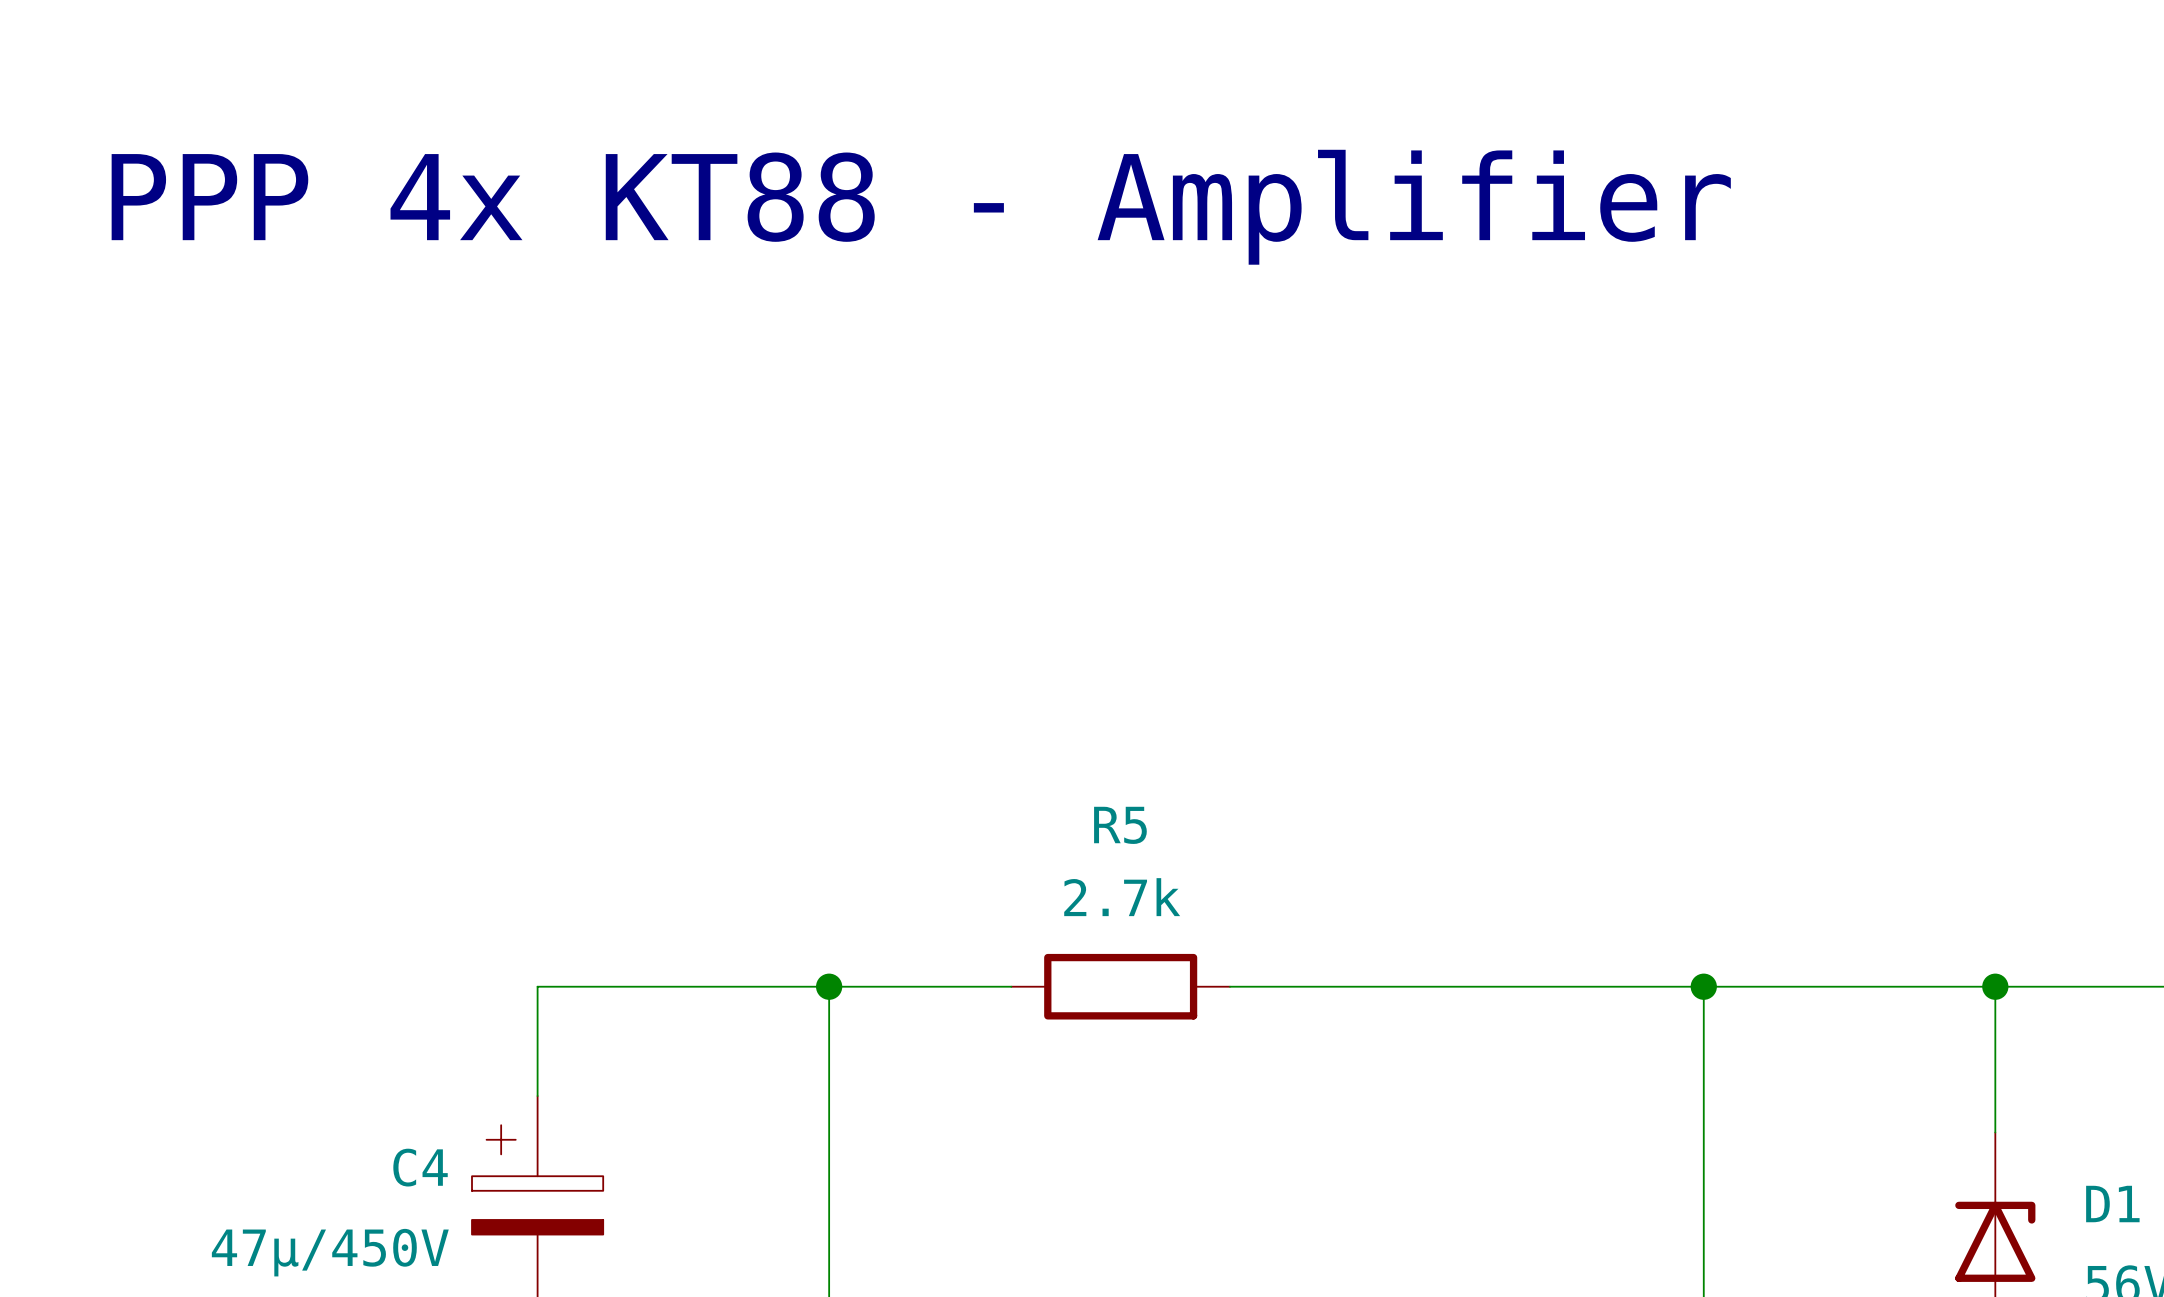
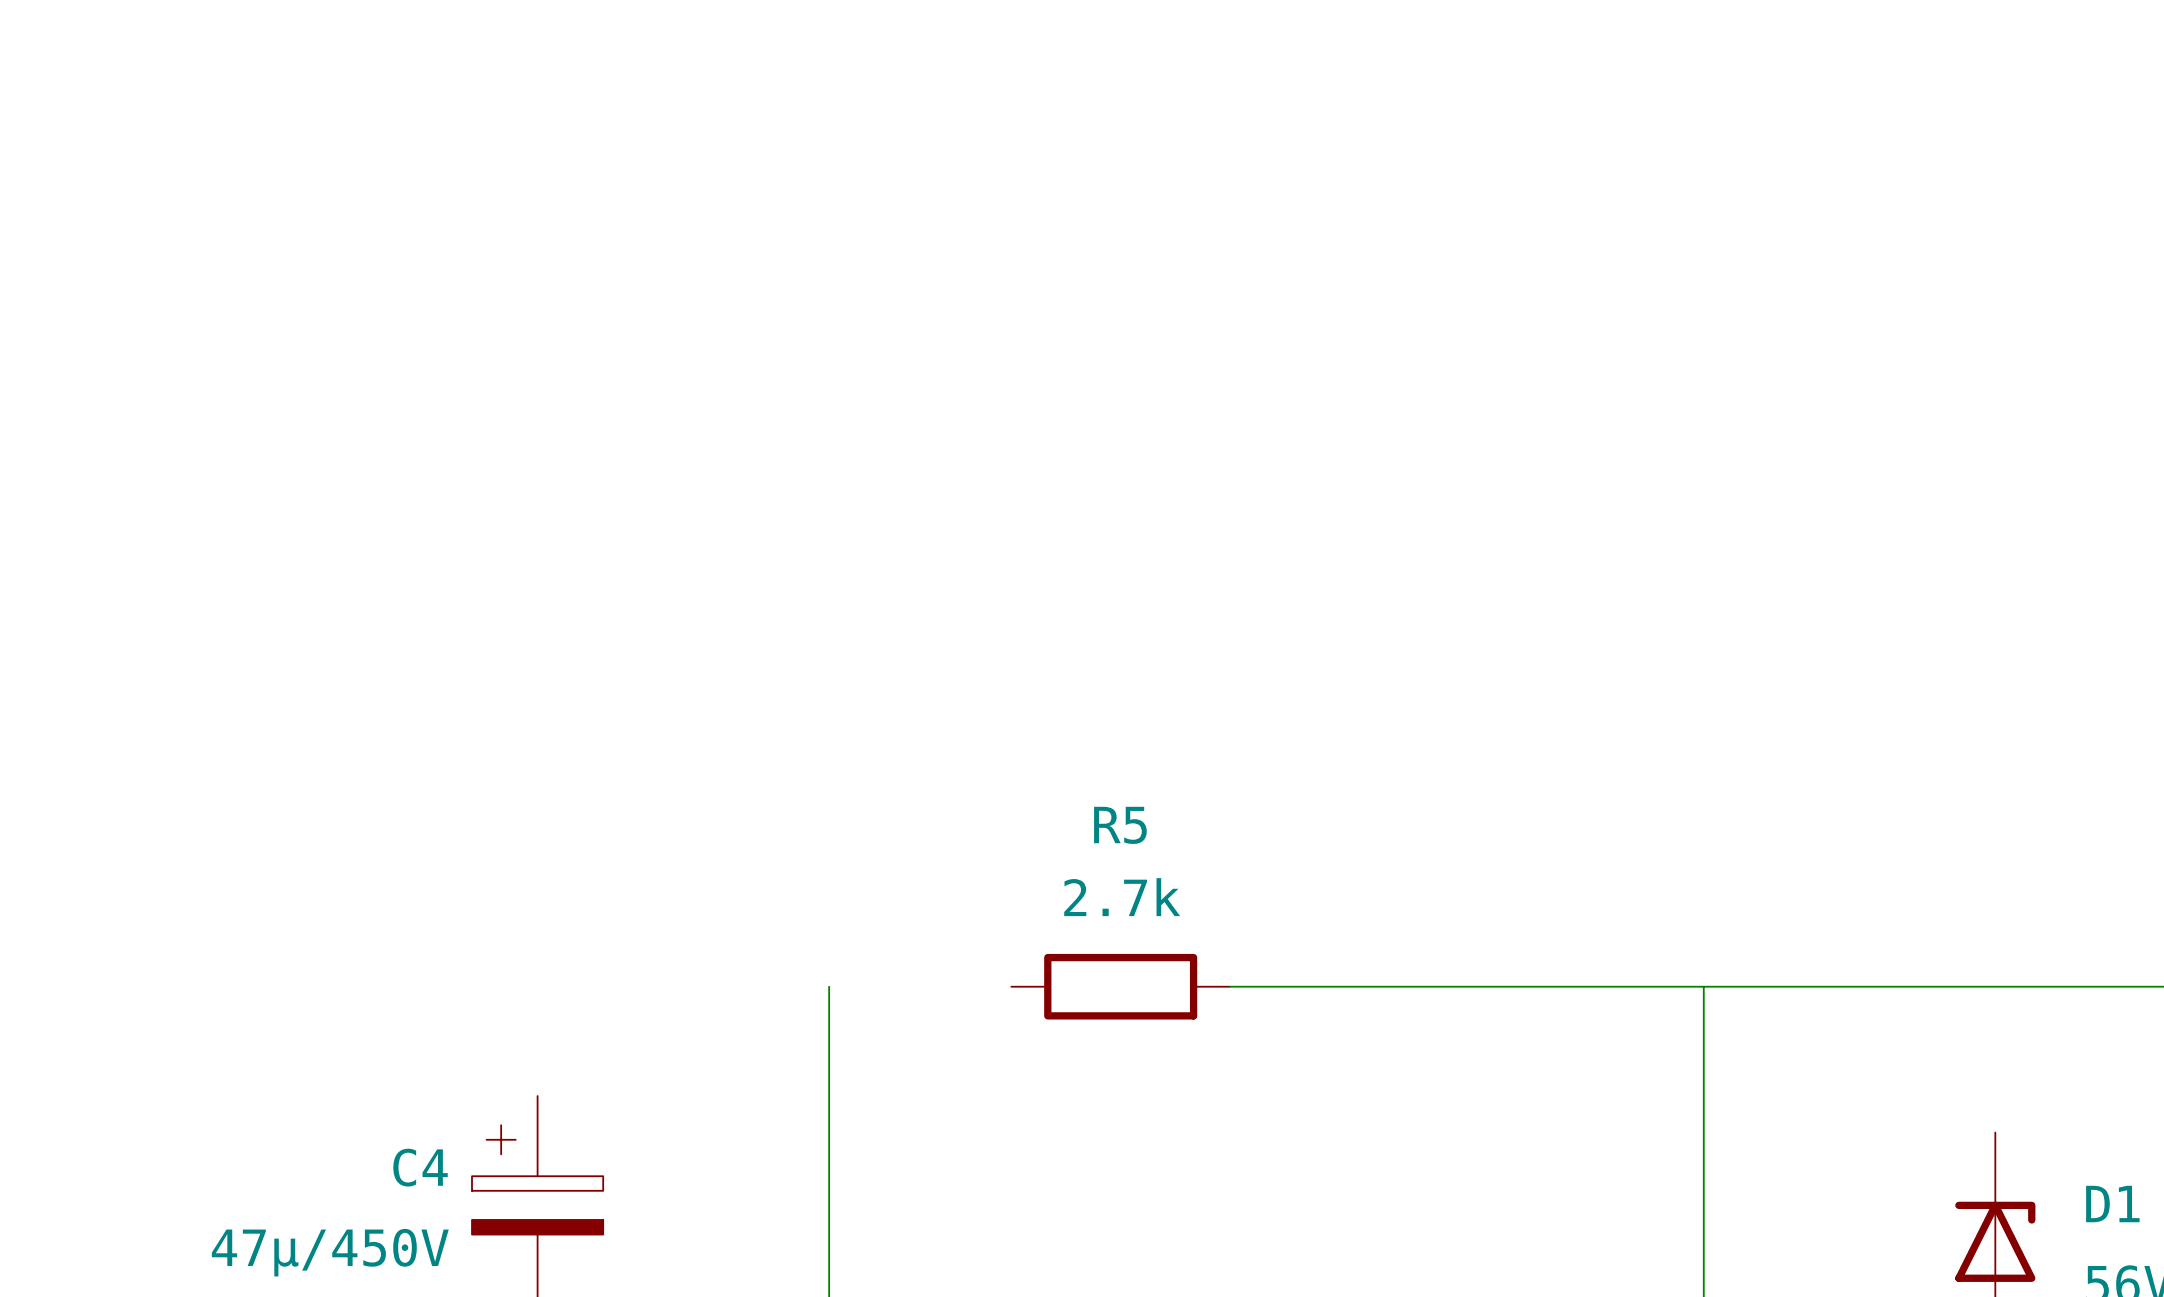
text: PPP 4x KT88 - Amplifier (921, 207) -> none
junction: (829, 986) -> none
wire: (1011, 986) (537, 986) (537, 1096) -> none
junction: (1703, 986) -> none
wire: (1995, 986) (1995, 1132) -> none
junction: (1995, 986) -> none

